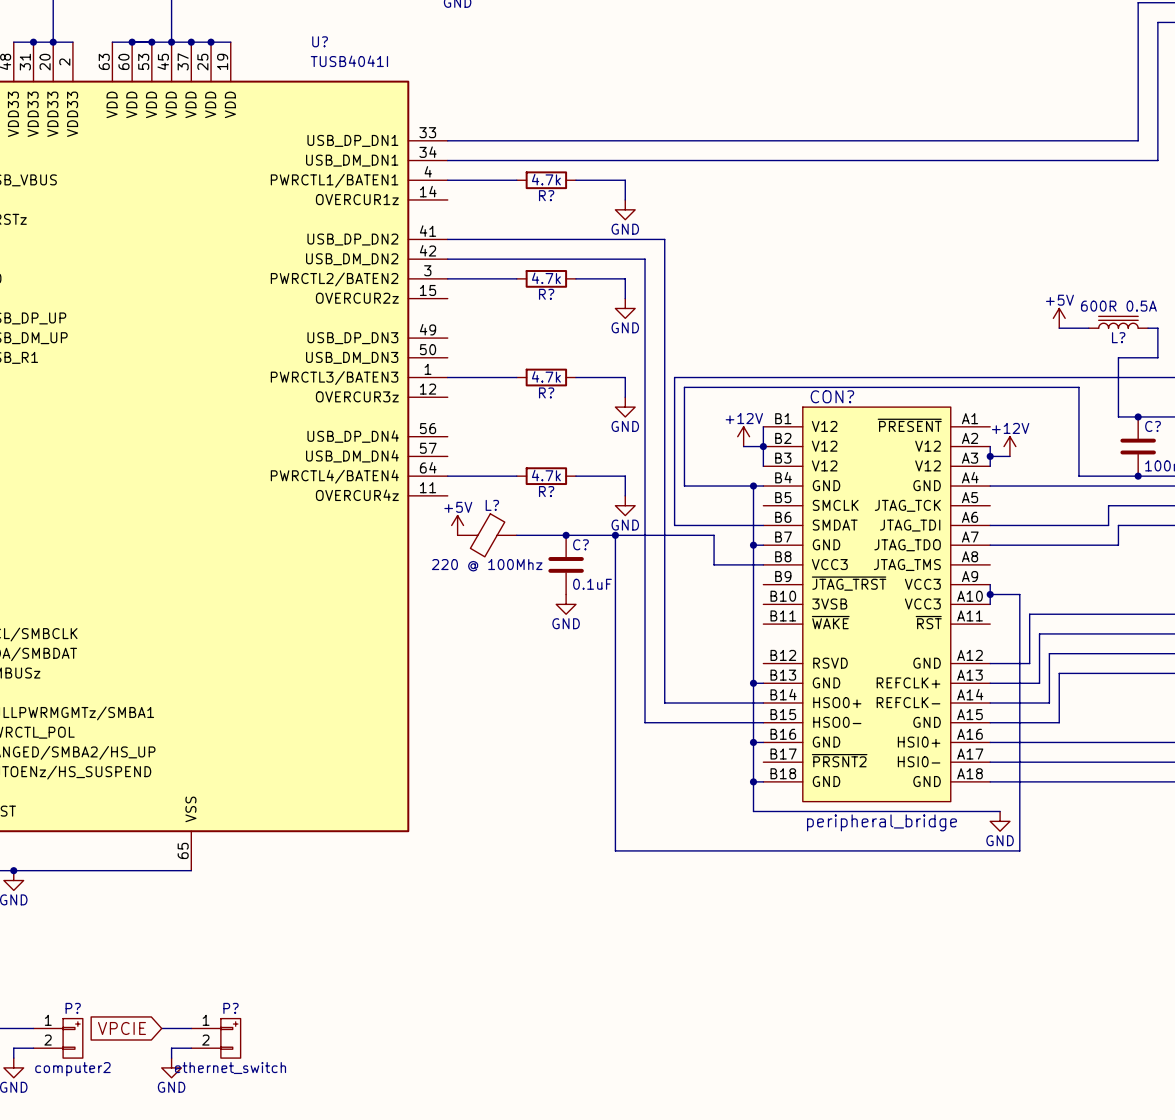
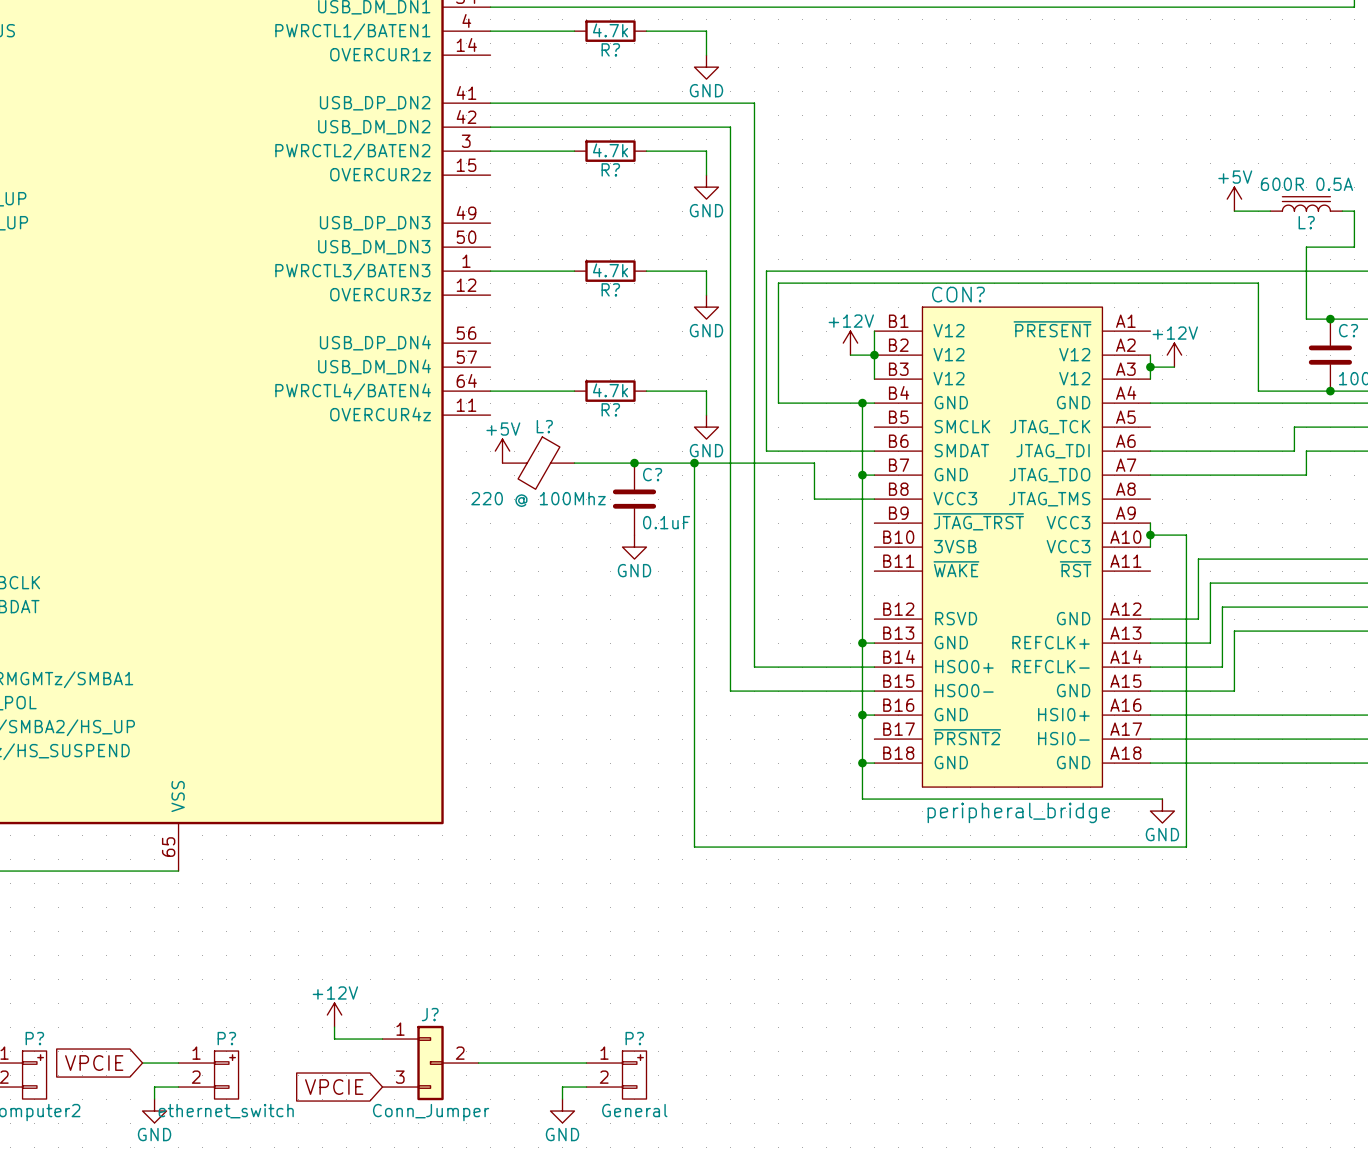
power symbol: none -> +12V (334, 1015)
wire: none -> (334, 1027) (334, 1039) (382, 1039)
J?: none -> Conn_Jumper (430, 1063)
wire: none -> (478, 1063) (586, 1063)
P?: none -> General (616, 1075)
global label: none -> VPCIE (334, 1087)
wire: none -> (586, 1087) (562, 1087) (562, 1099)
power symbol: none -> GND (562, 1111)

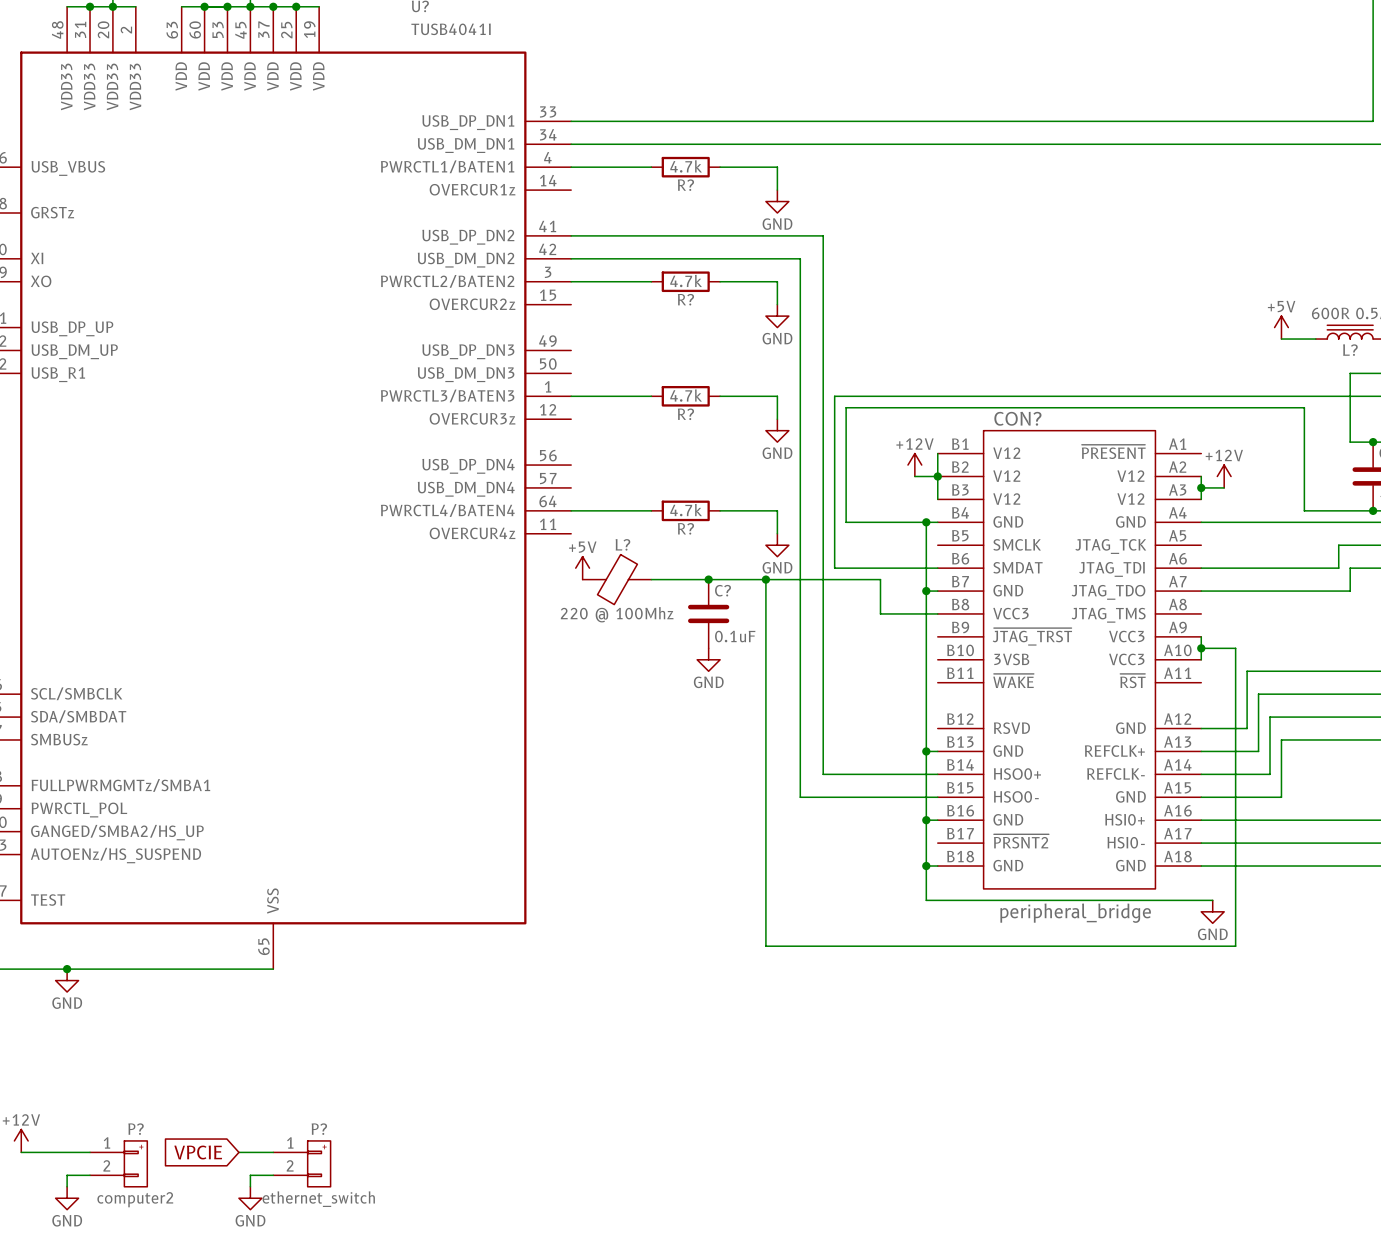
power symbol: +12V (334, 1015) -> none
wire: (334, 1027) (334, 1039) (382, 1039) -> none
J?: Conn_Jumper (430, 1063) -> none
wire: (478, 1063) (586, 1063) -> none
P?: General (616, 1075) -> none
global label: VPCIE (334, 1087) -> none
wire: (586, 1087) (562, 1087) (562, 1099) -> none
power symbol: GND (562, 1111) -> none

